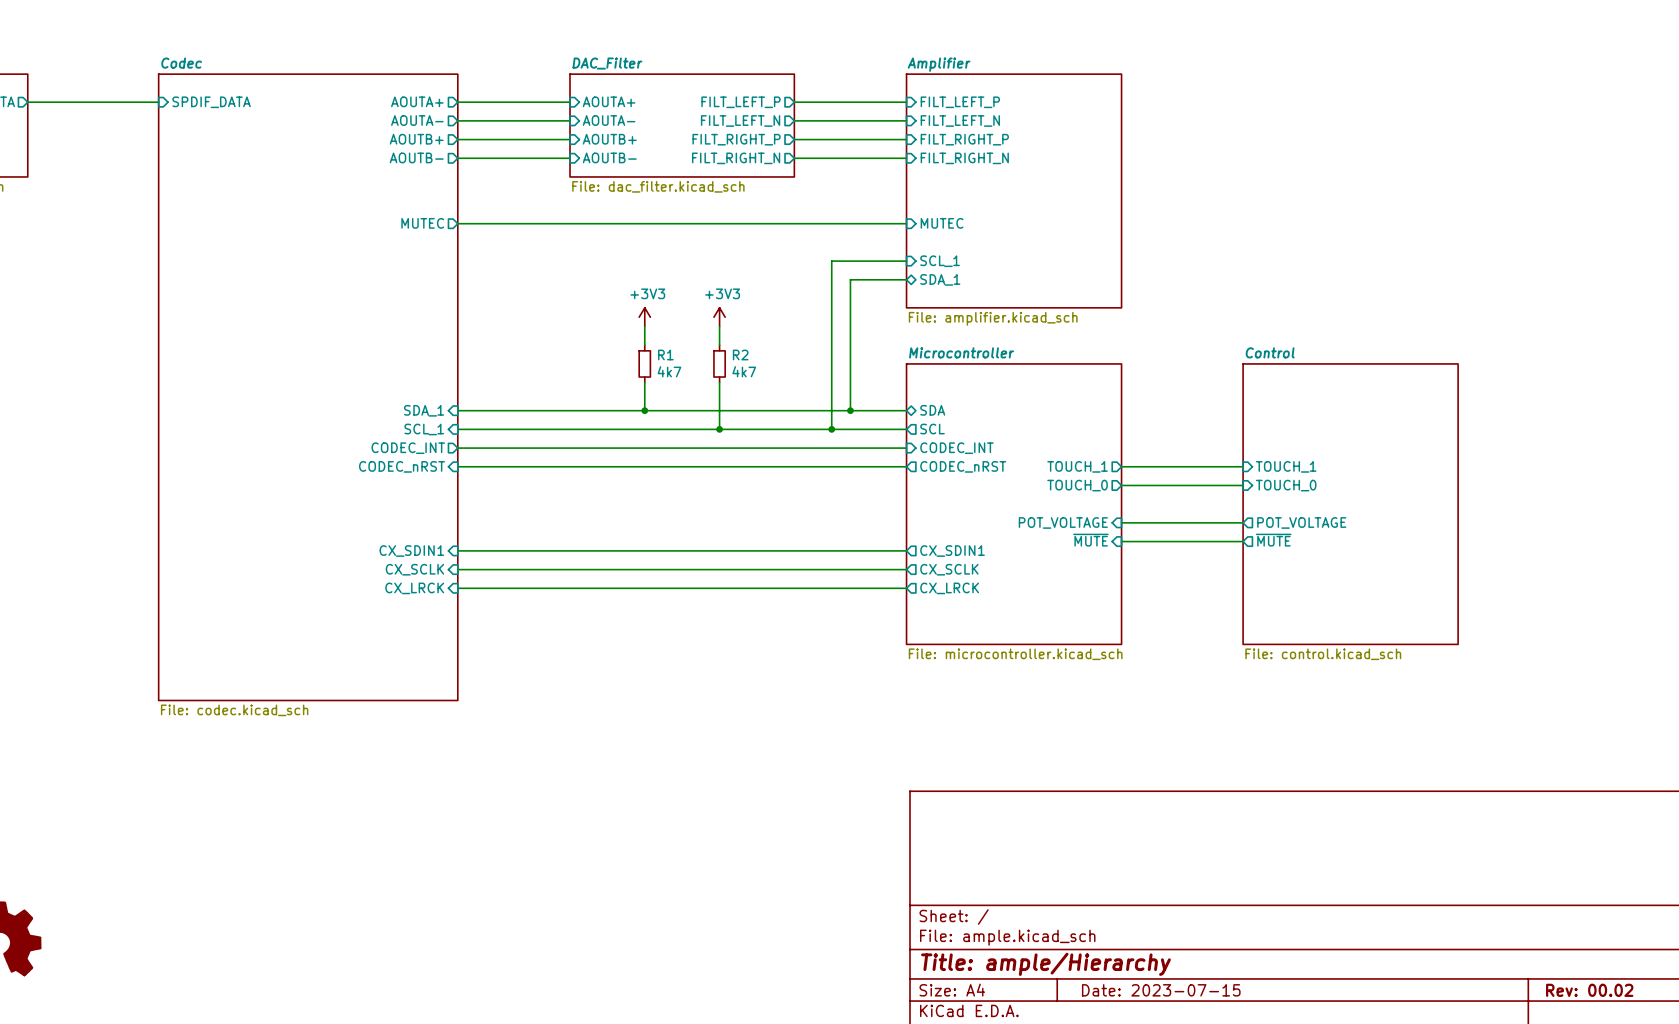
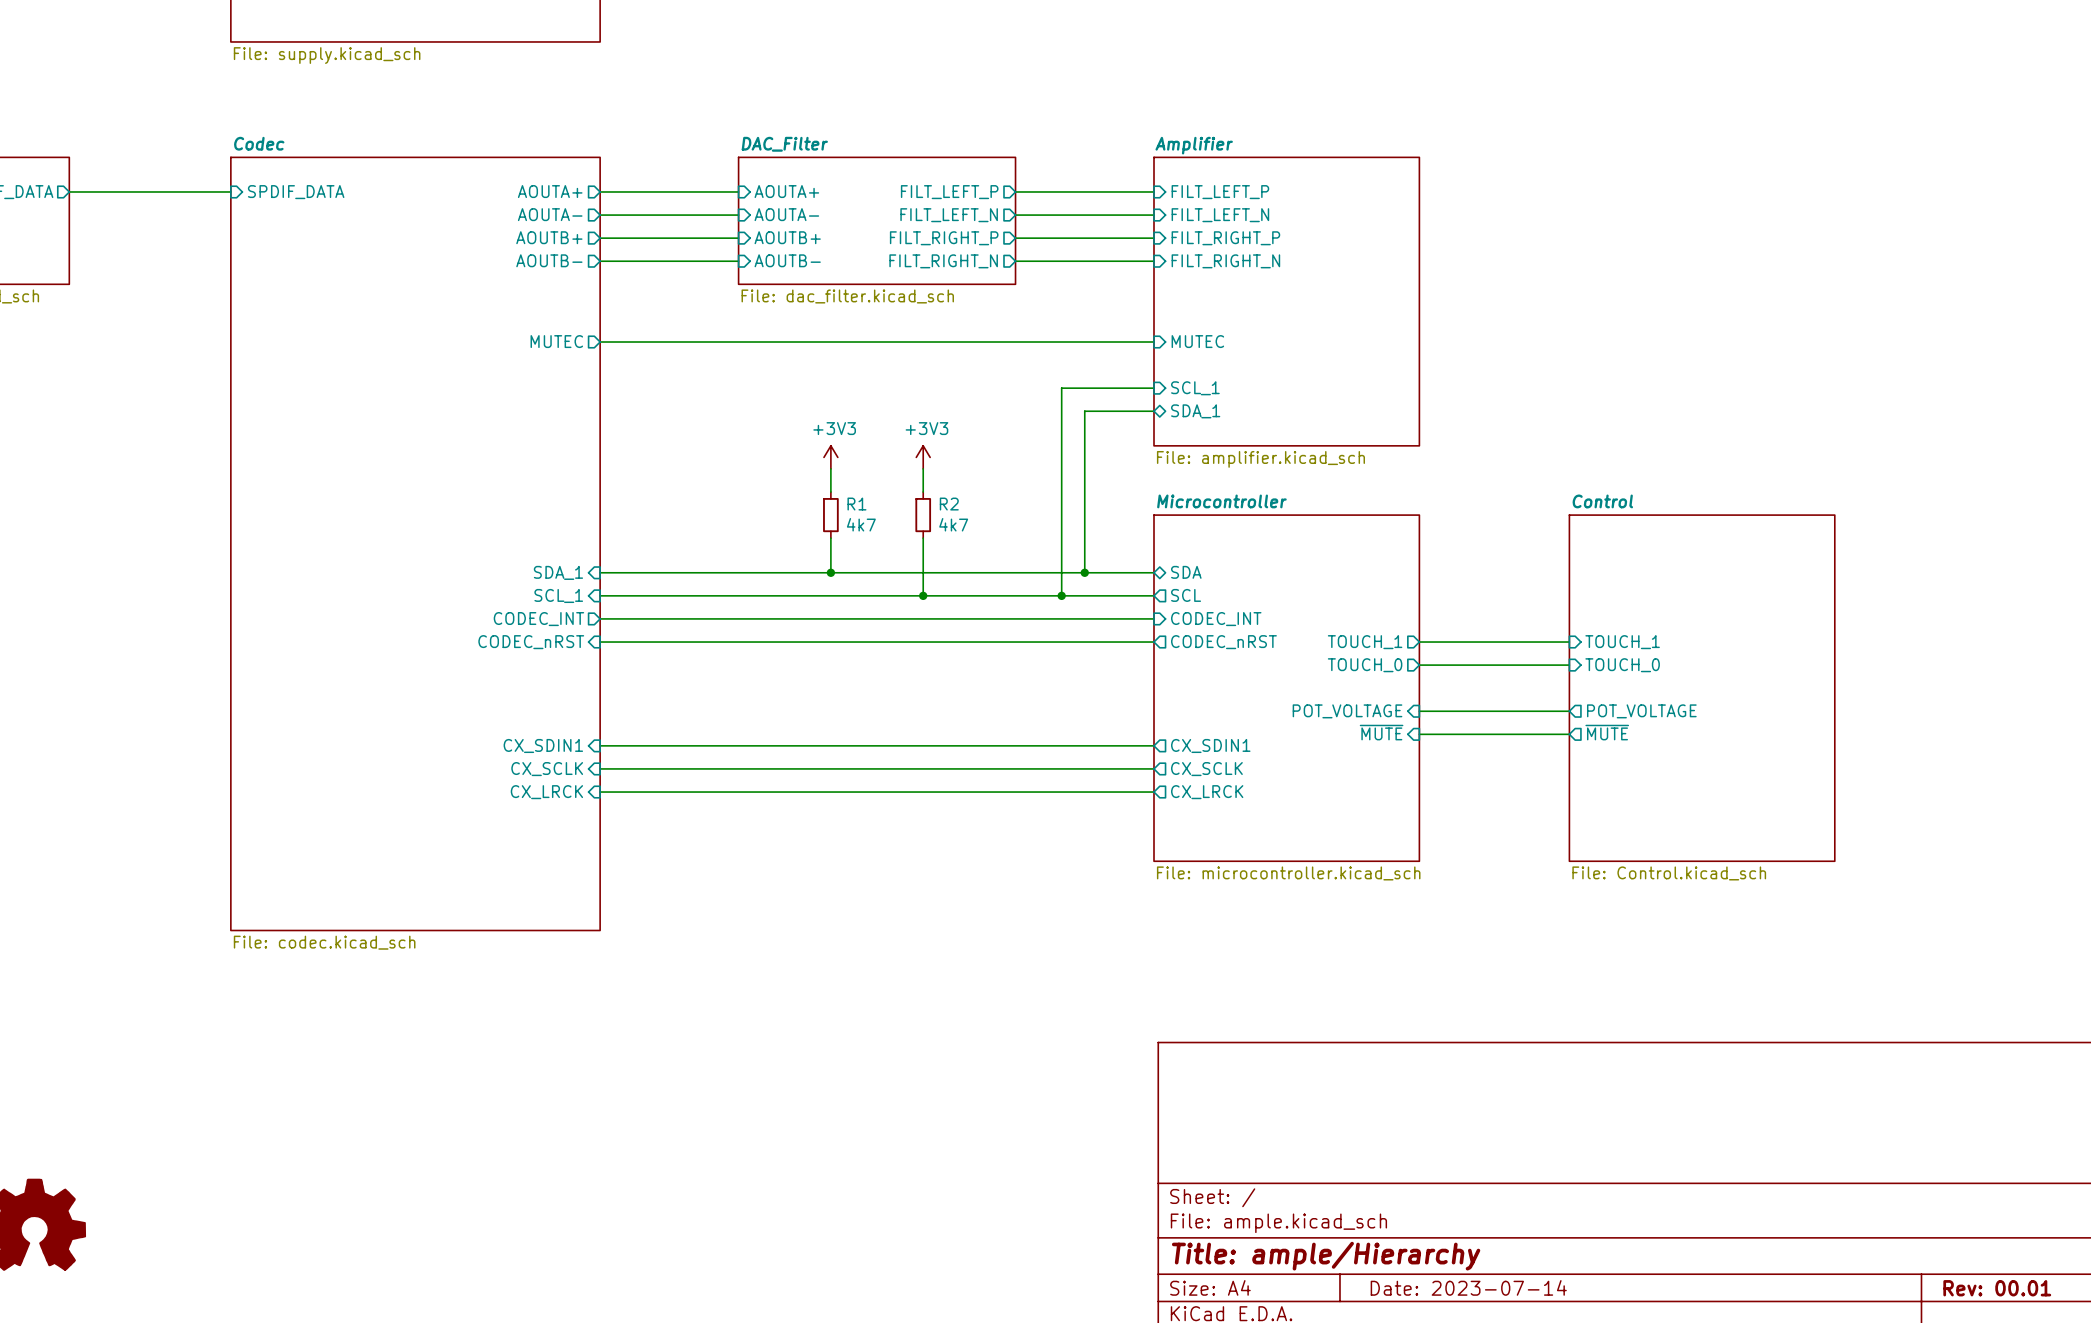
sheet Control value: File: control.kicad_sch (1323, 654) -> File: Control.kicad_sch (1669, 873)
title block: Date: 2023-07-15 (1161, 990) -> Date: 2023-07-14 (1468, 1287)
title block: Rev: 00.02 (1589, 990) -> Rev: 00.01 (1997, 1288)

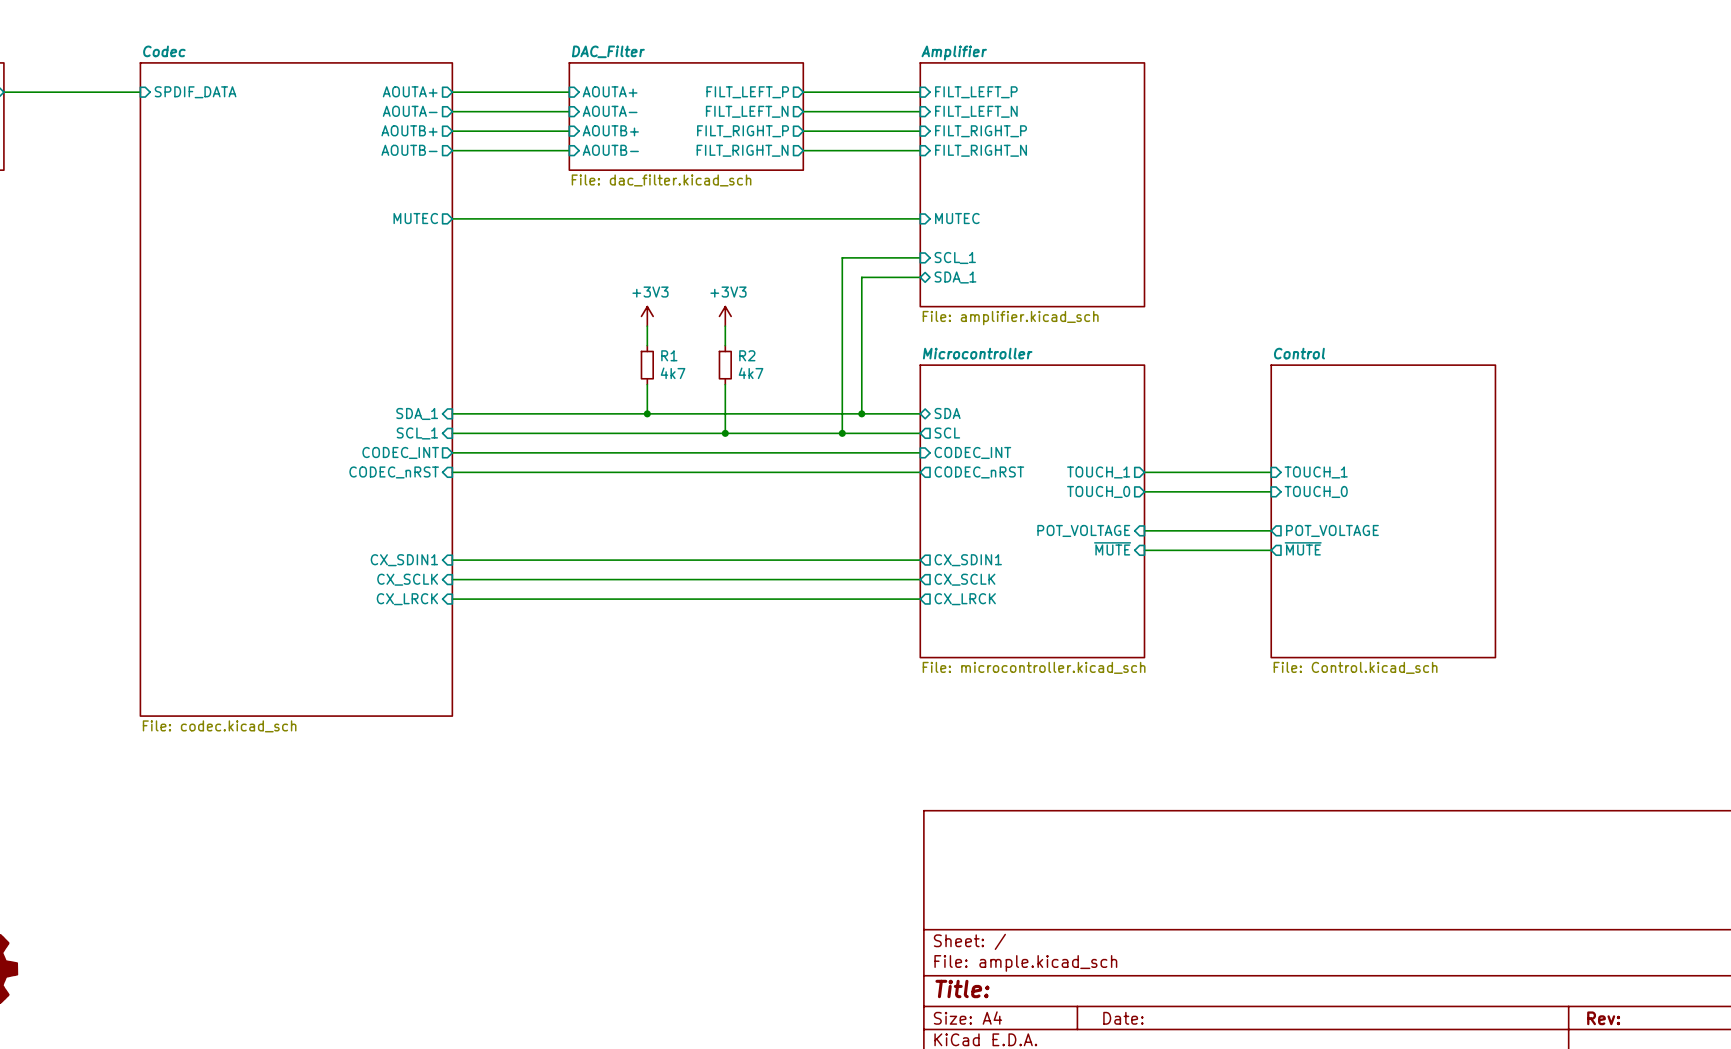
title block: Title: ample/Hierarchy (1326, 1256) -> Title: (962, 988)
title block: Date: 2023-07-14 (1468, 1287) -> Date: (1123, 1018)
title block: Rev: 00.01 (1997, 1288) -> Rev: (1603, 1018)

